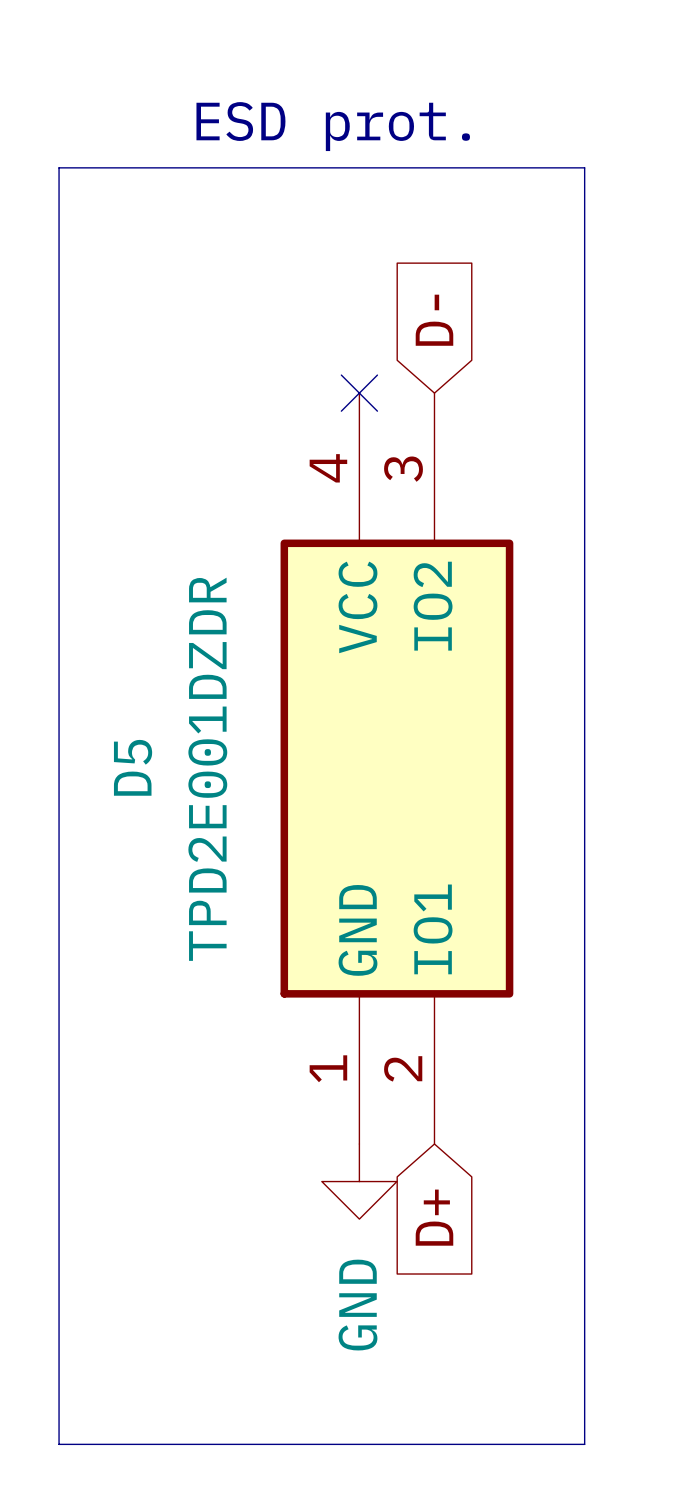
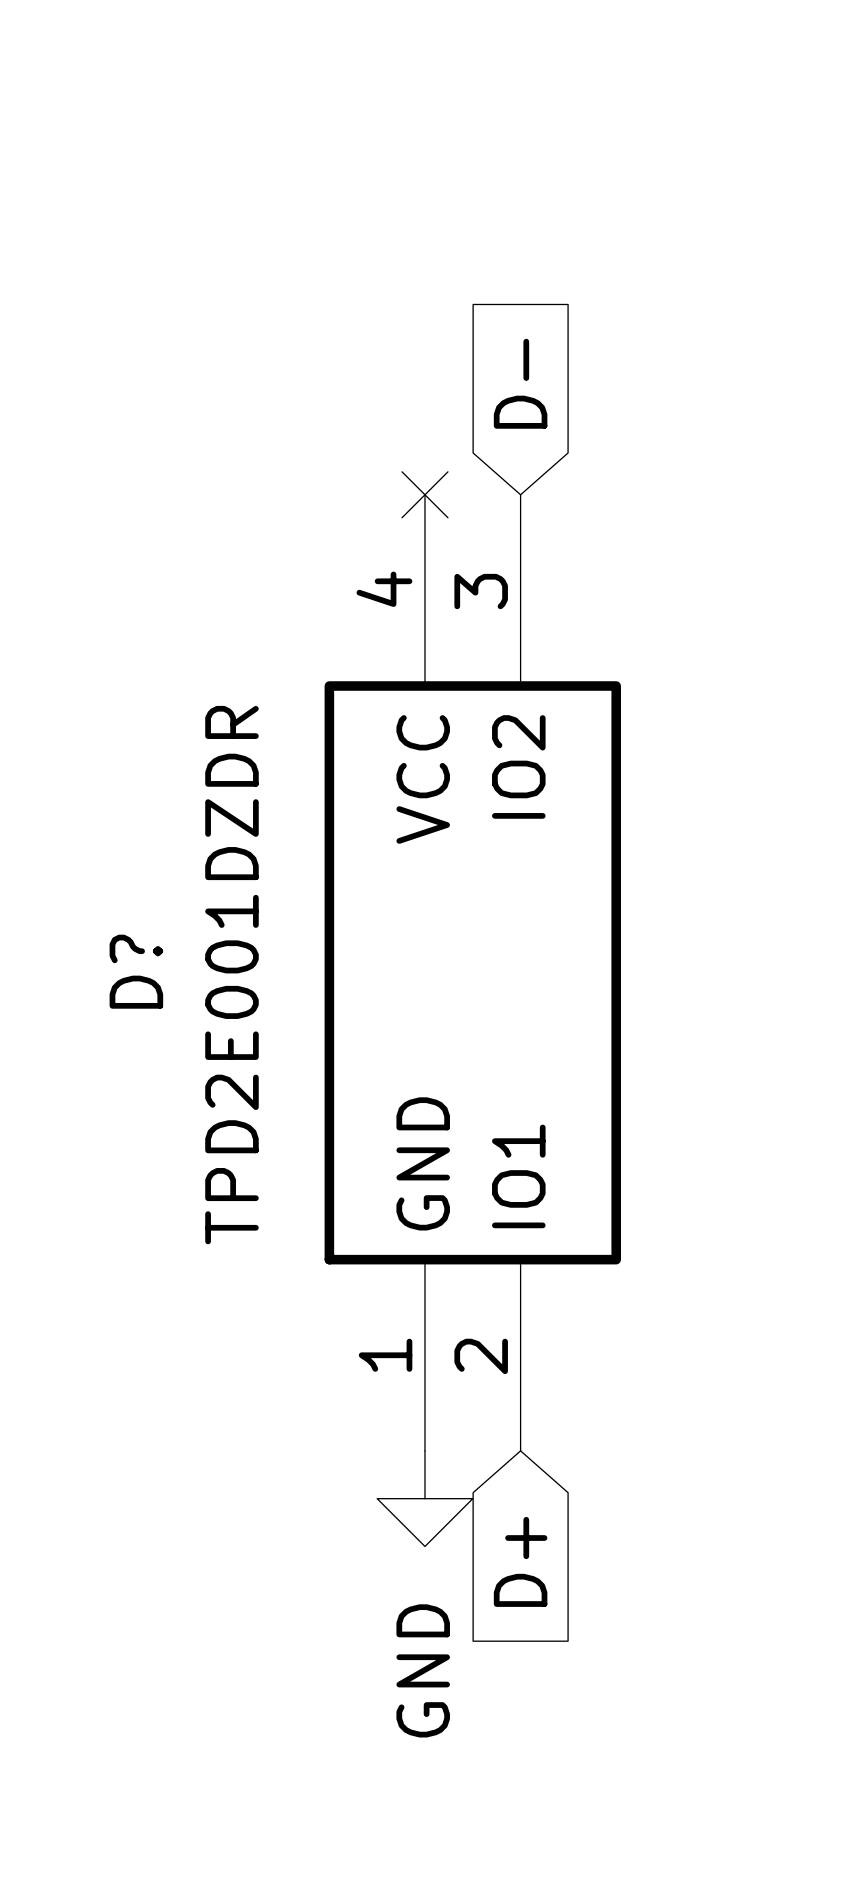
text: ESD prot. (333, 126) -> none
line: (59, 167) (584, 167) (584, 1444) (59, 1444) (59, 167) -> none
D5 name: D5 (133, 767) -> D? (136, 971)

